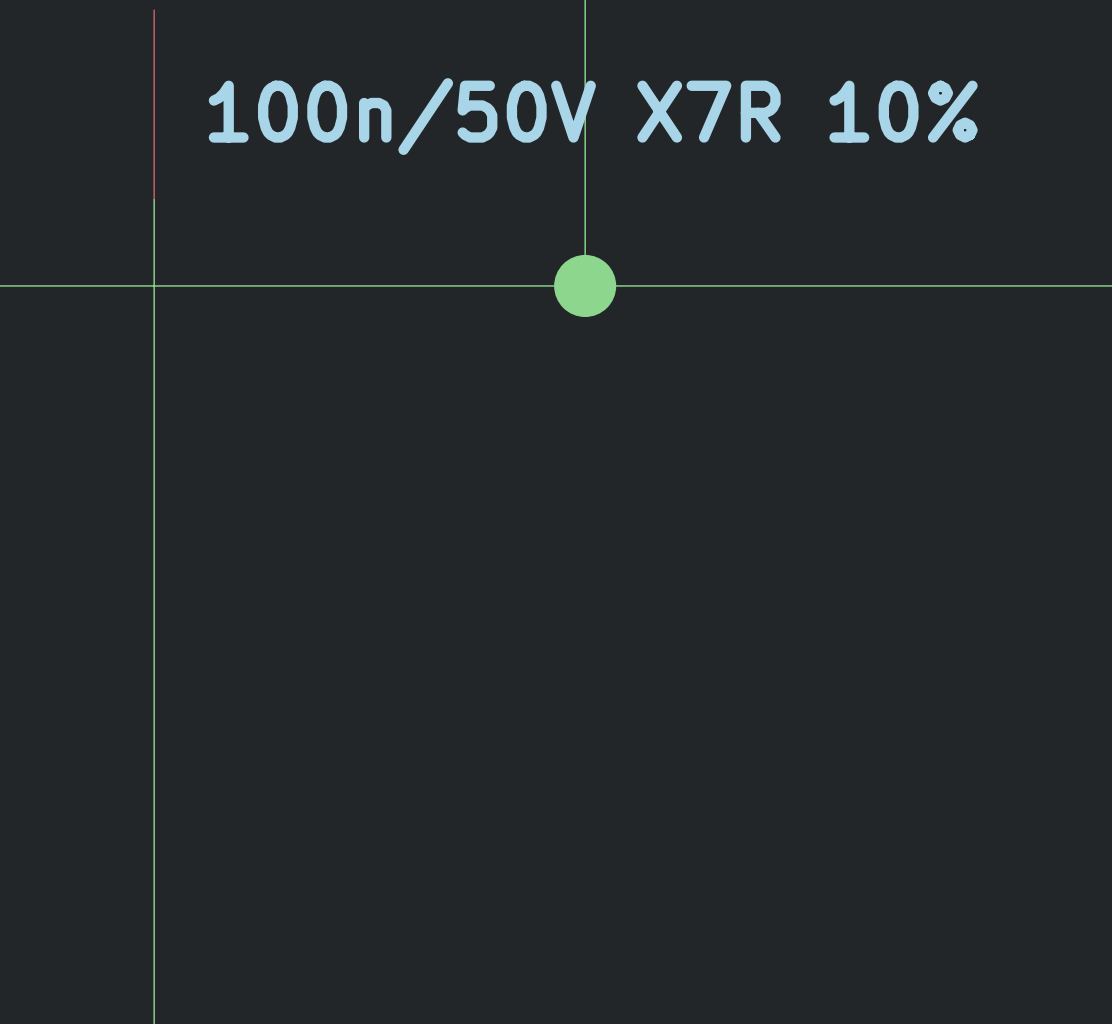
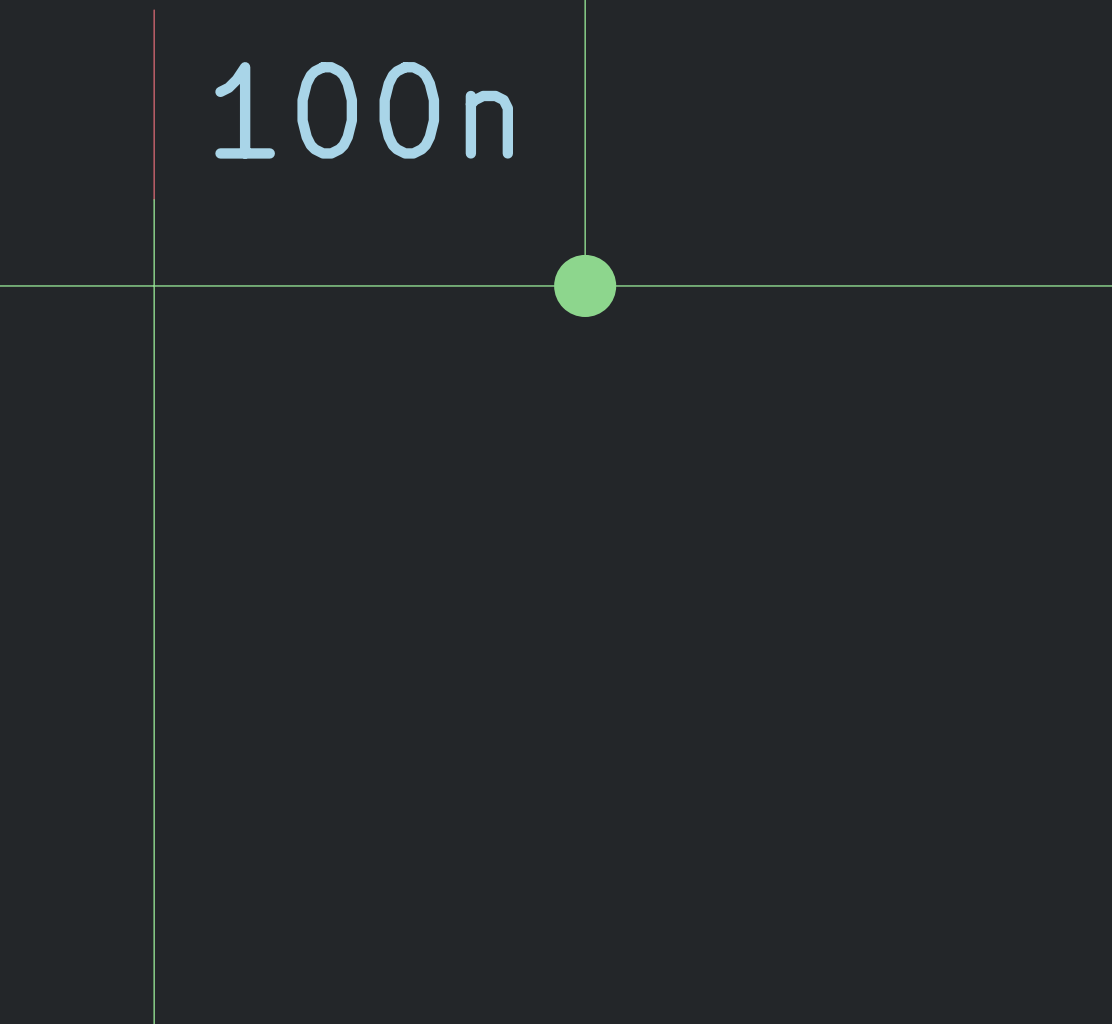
part value: 100n/50V X7R 10% (593, 116) -> 100n (364, 110)

